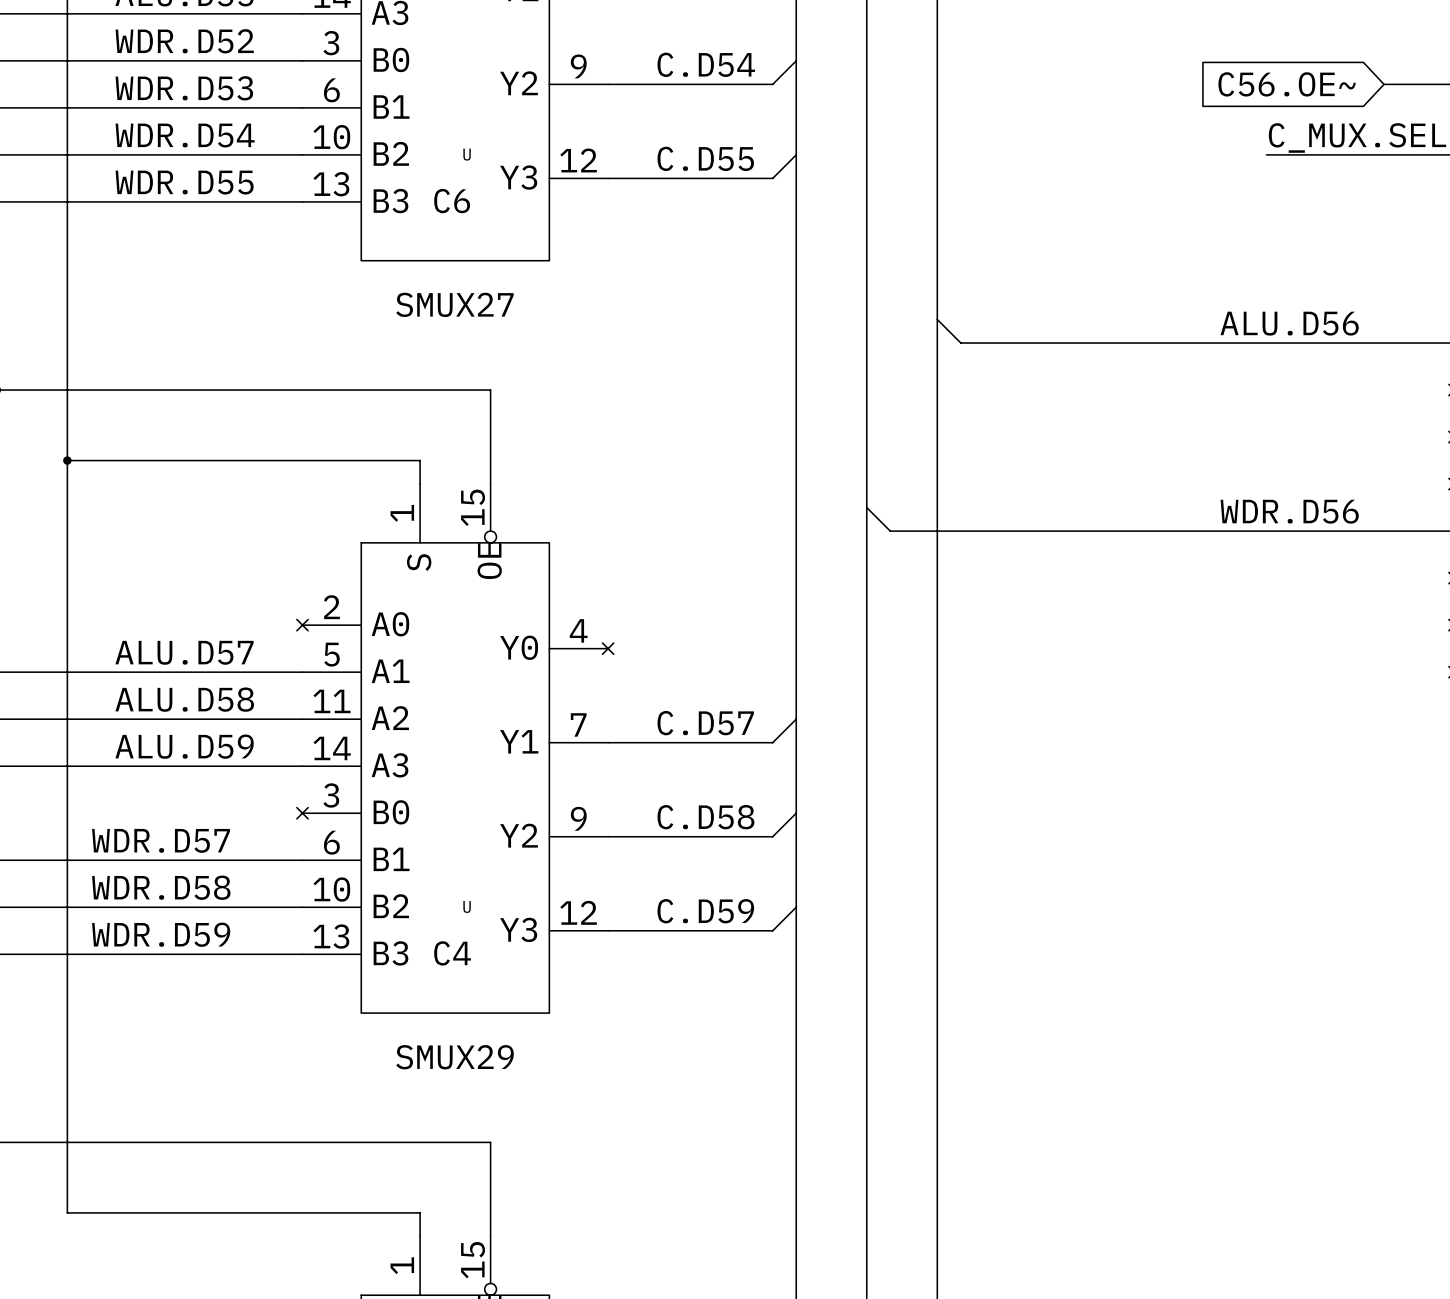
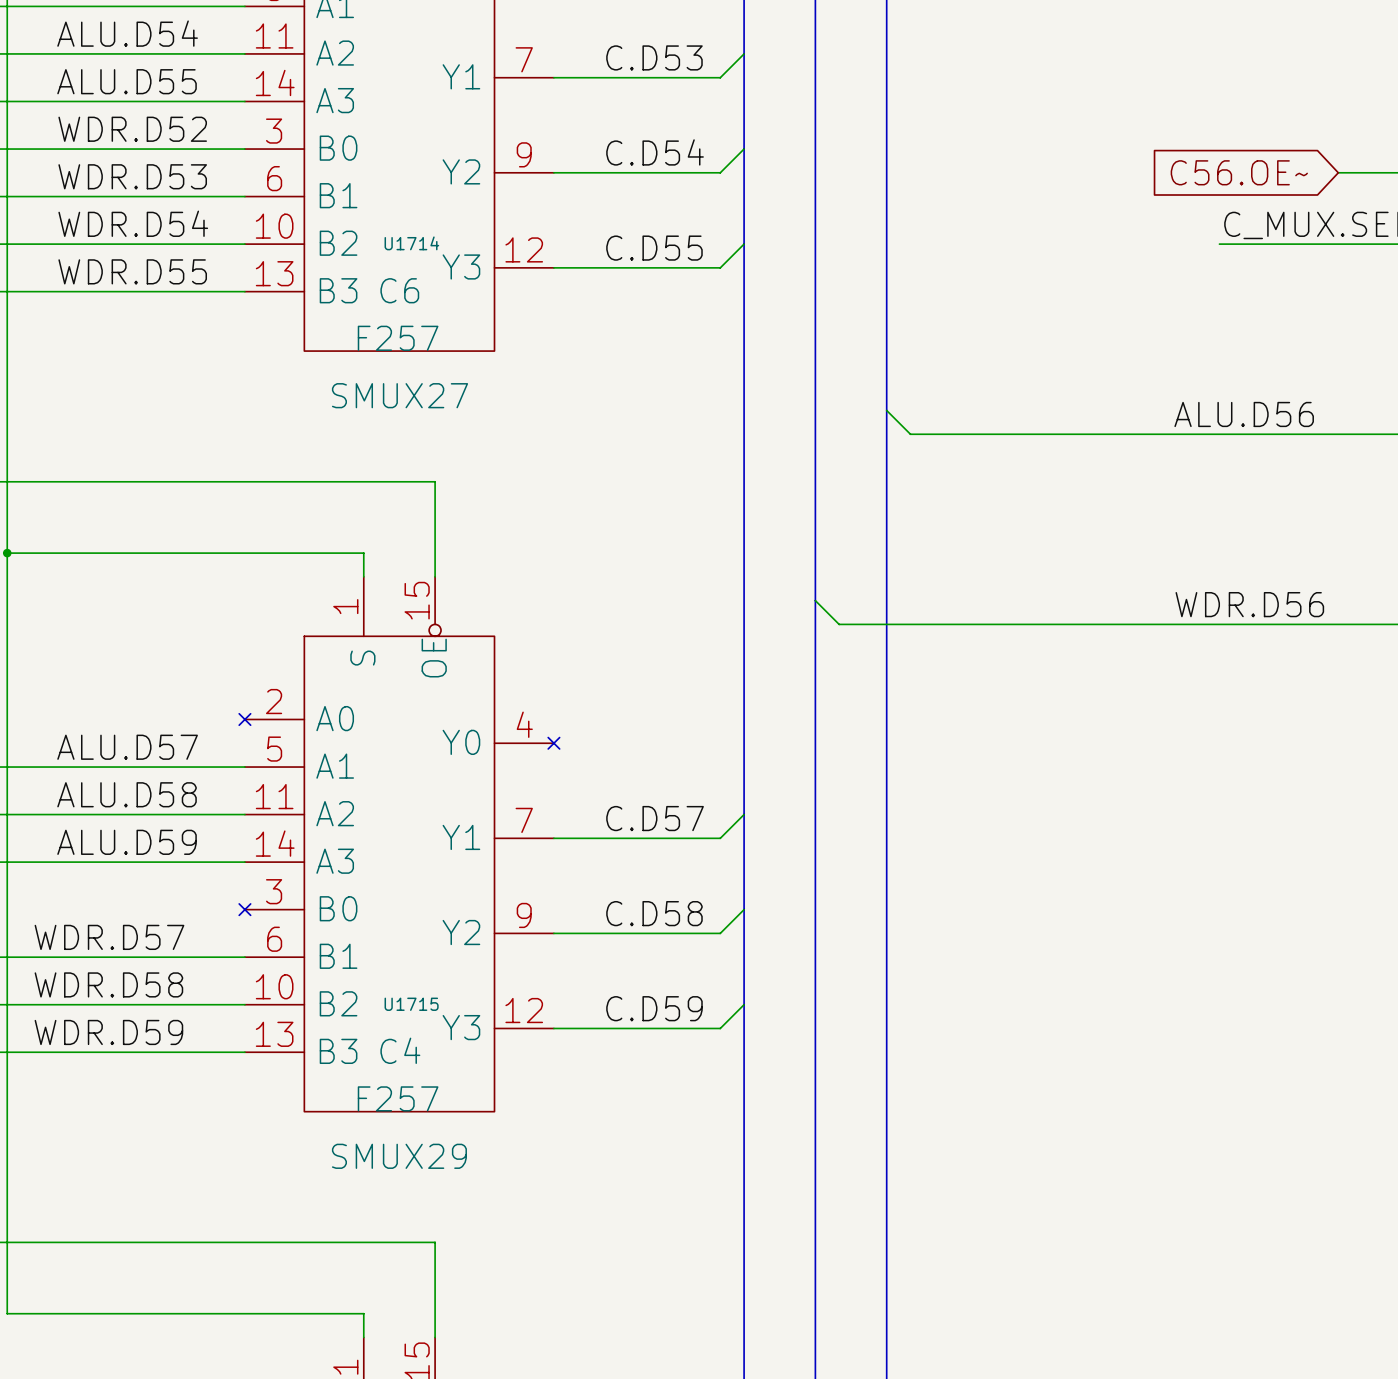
U name: U (467, 154) -> U1714 (411, 243)
U value: none -> F257 (398, 338)
U name: U (467, 906) -> U1715 (411, 1004)
U value: none -> F257 (398, 1098)

